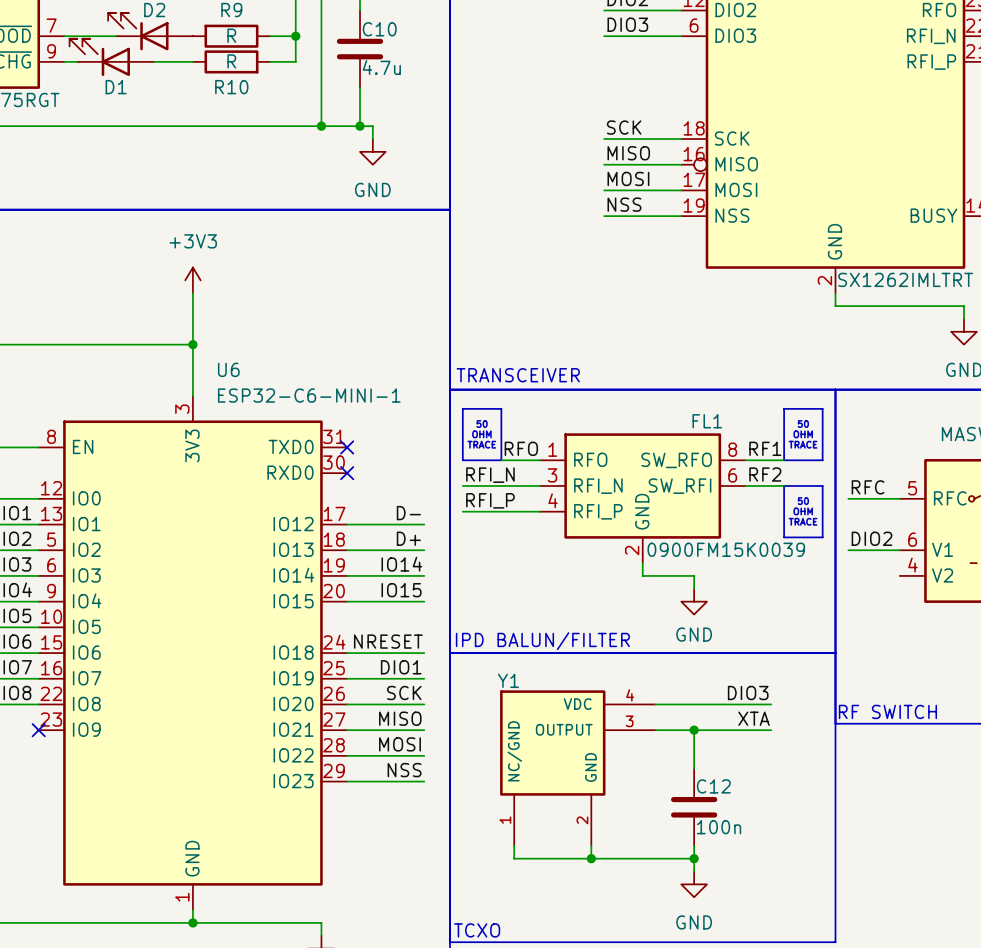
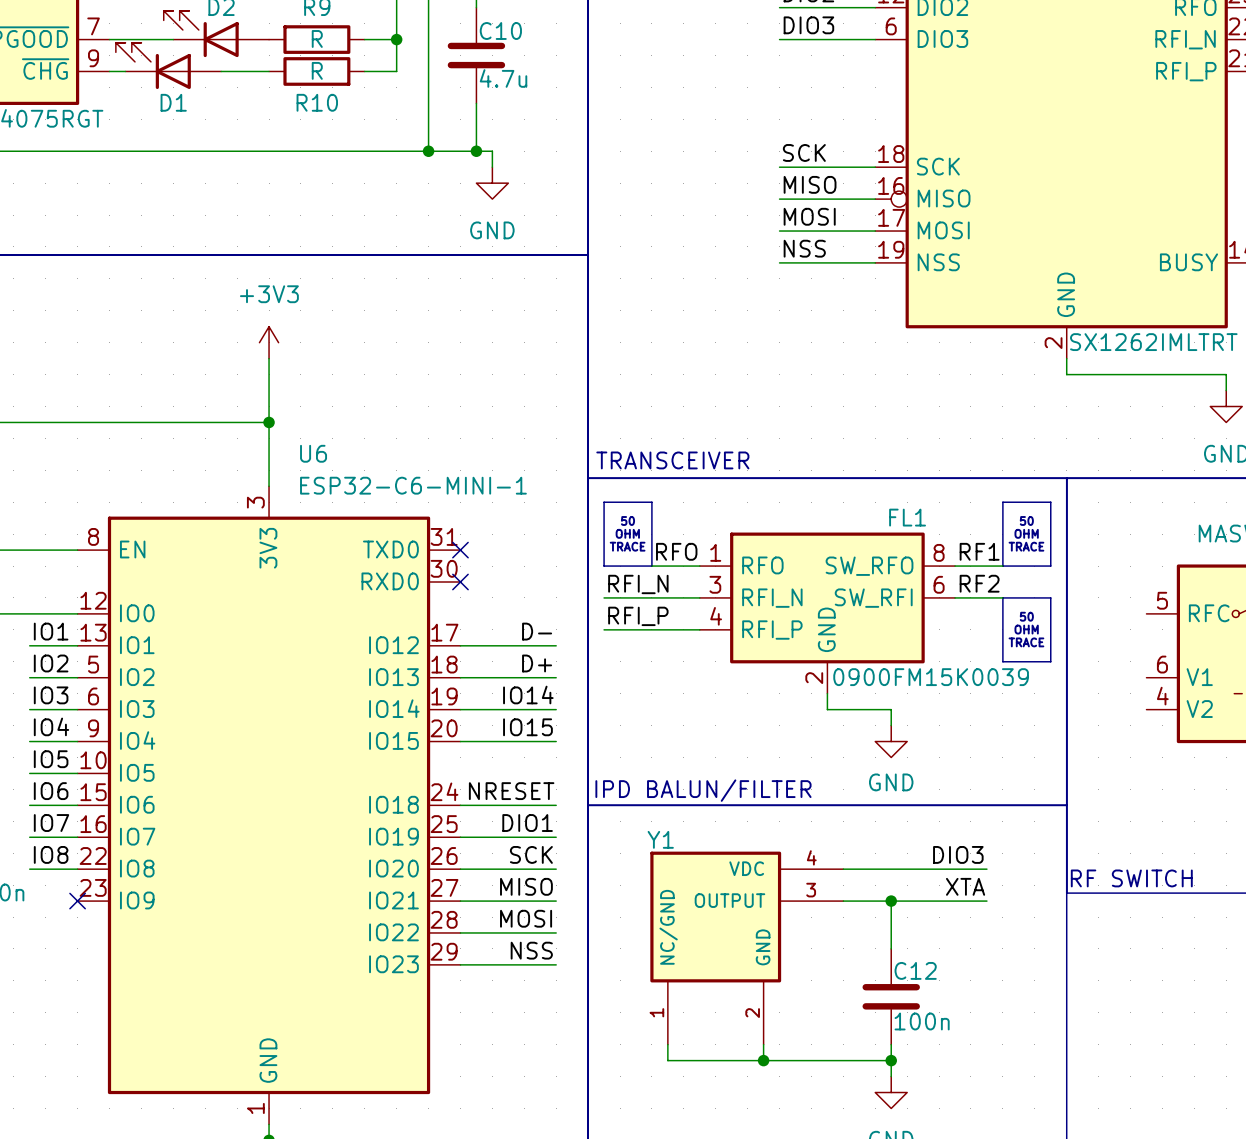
label: RFC (868, 487) -> none
wire: (848, 498) (899, 498) -> none
label: DIO2 (872, 538) -> none
wire: (848, 550) (899, 550) -> none

